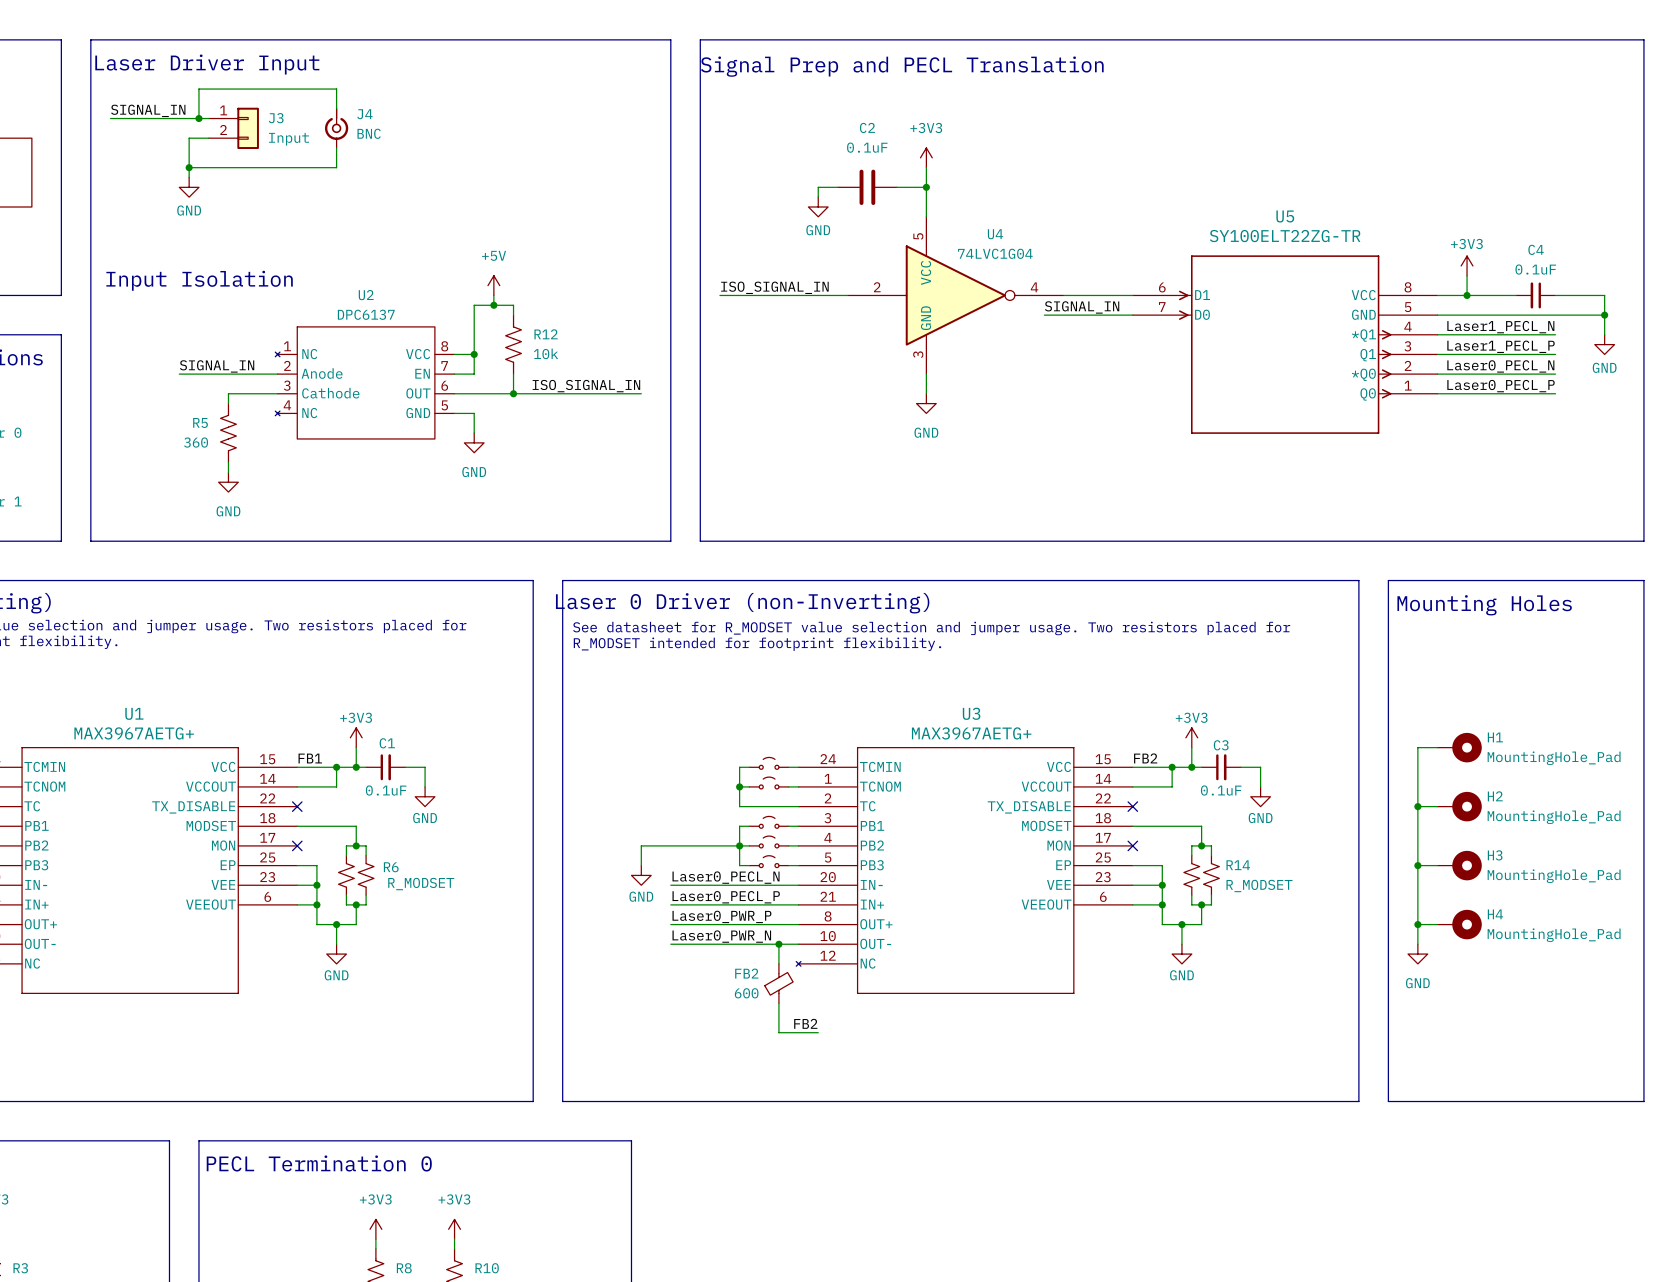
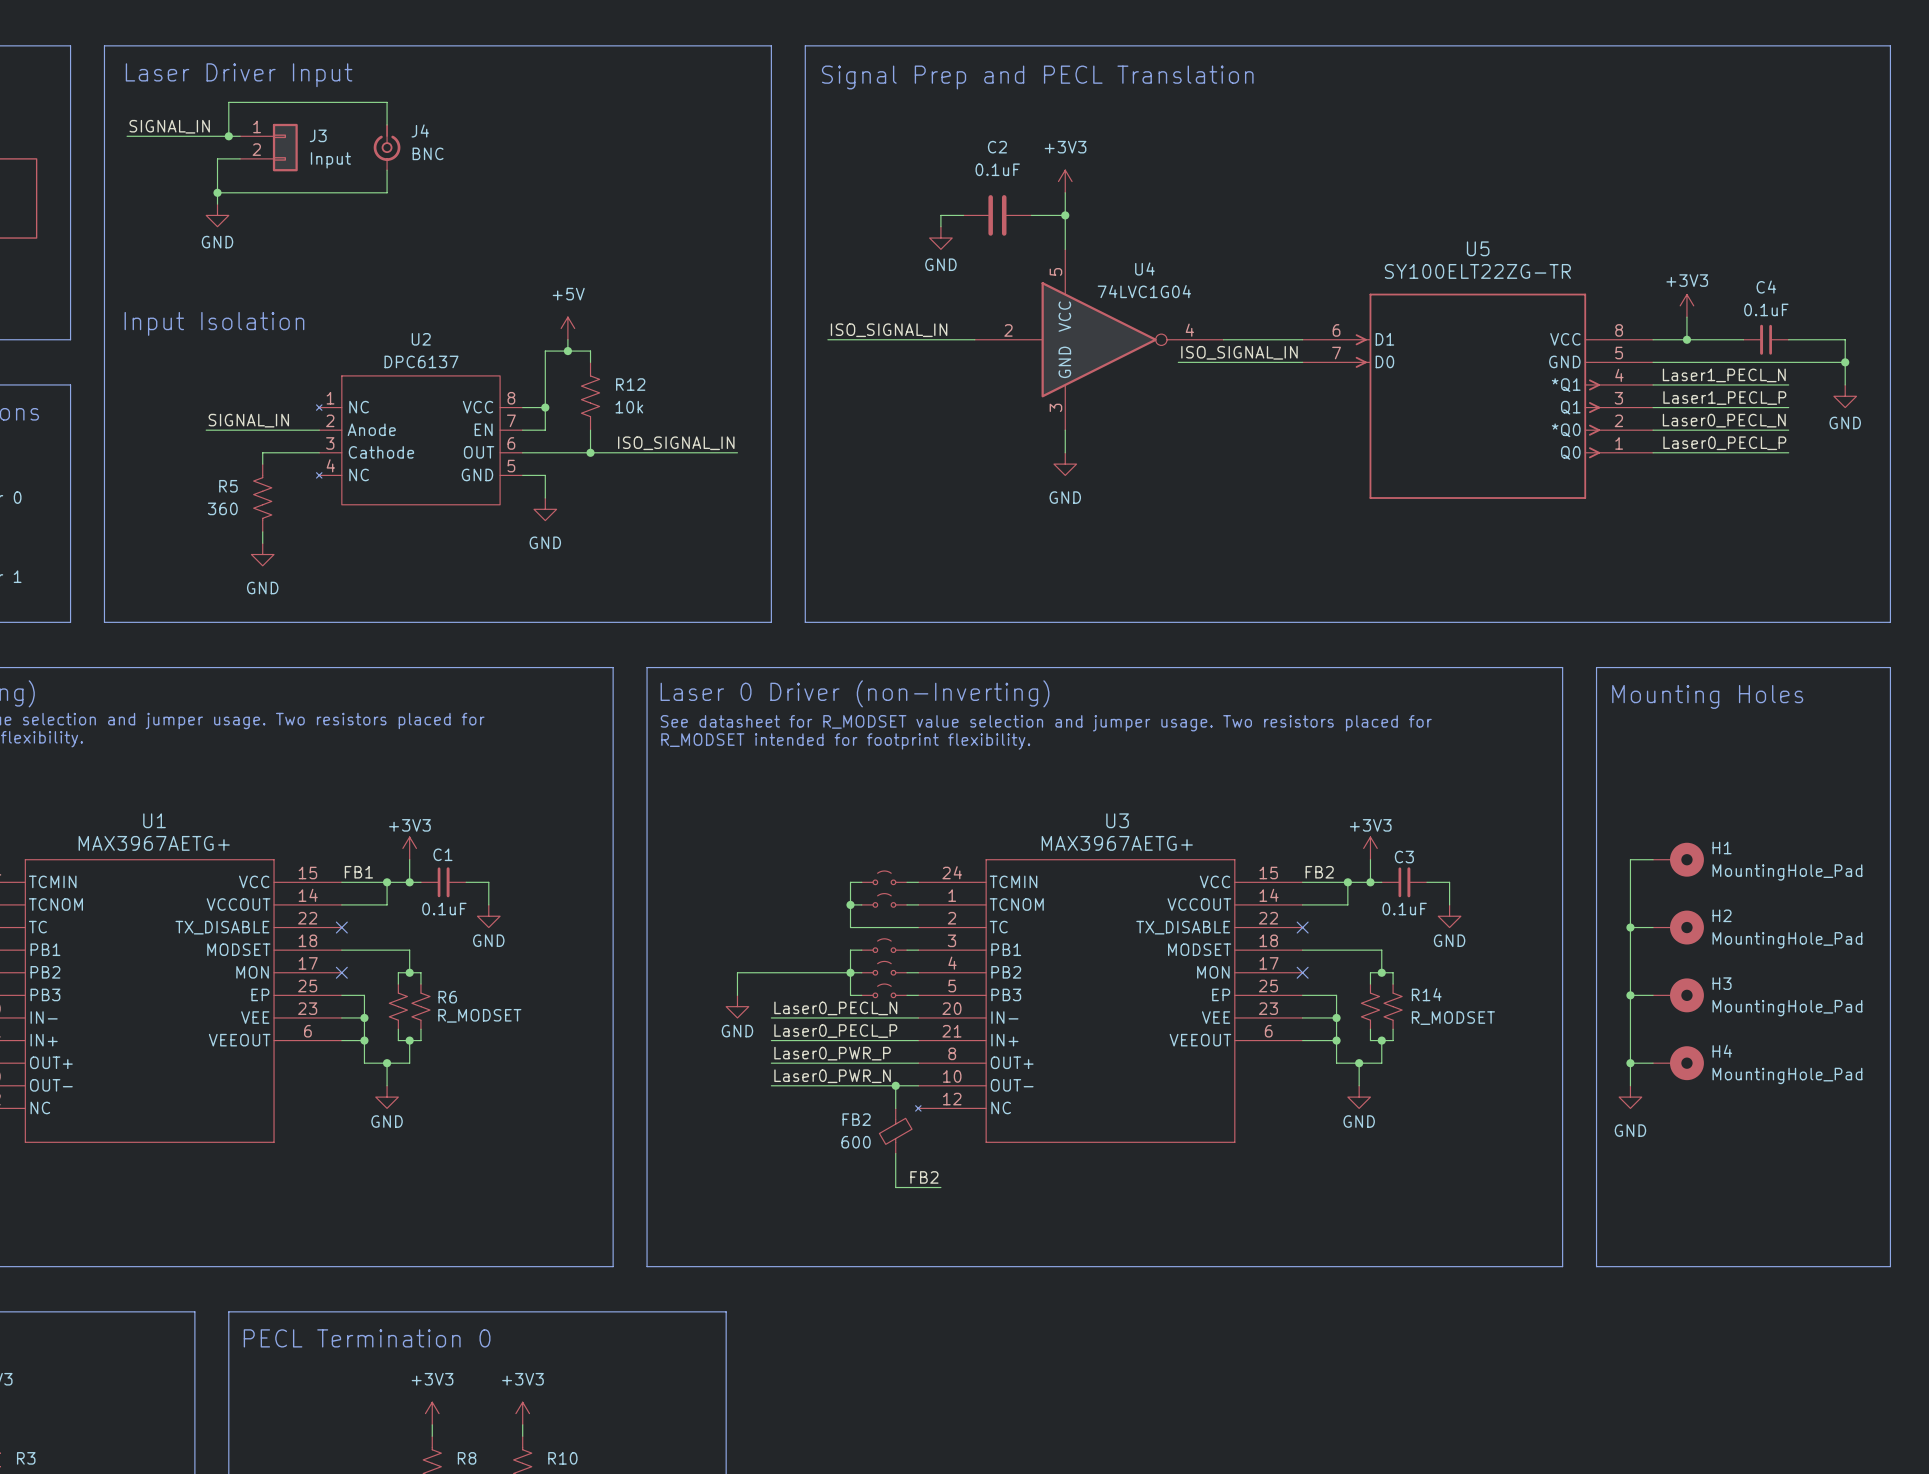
label: SIGNAL_IN (1082, 307) -> ISO_SIGNAL_IN (1239, 352)
wire: none -> (1178, 362) (1200, 362)

